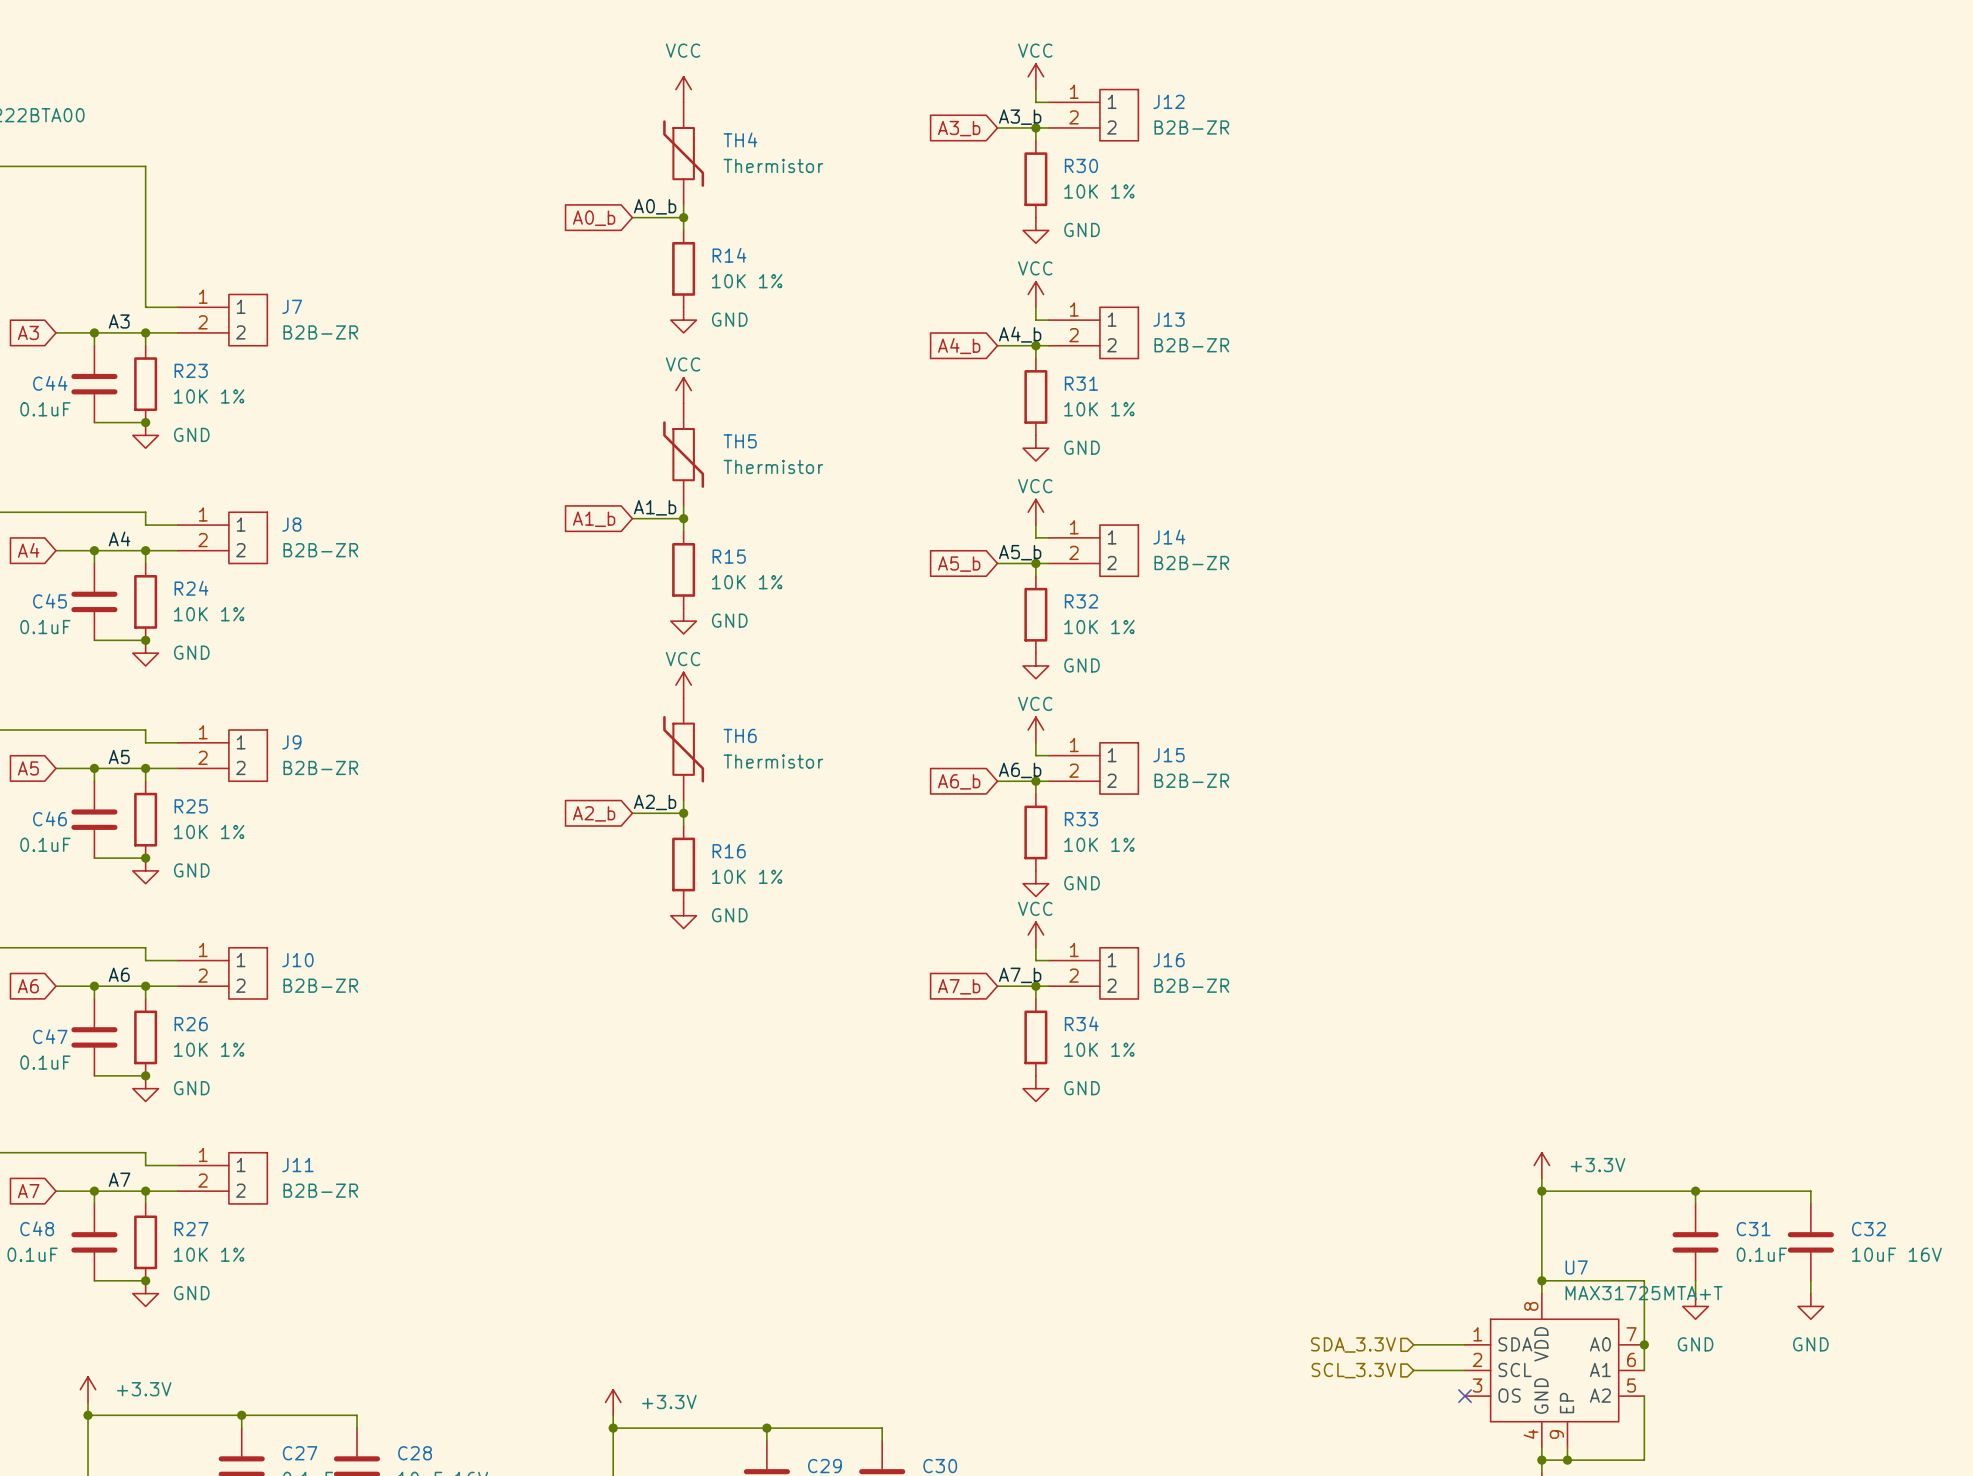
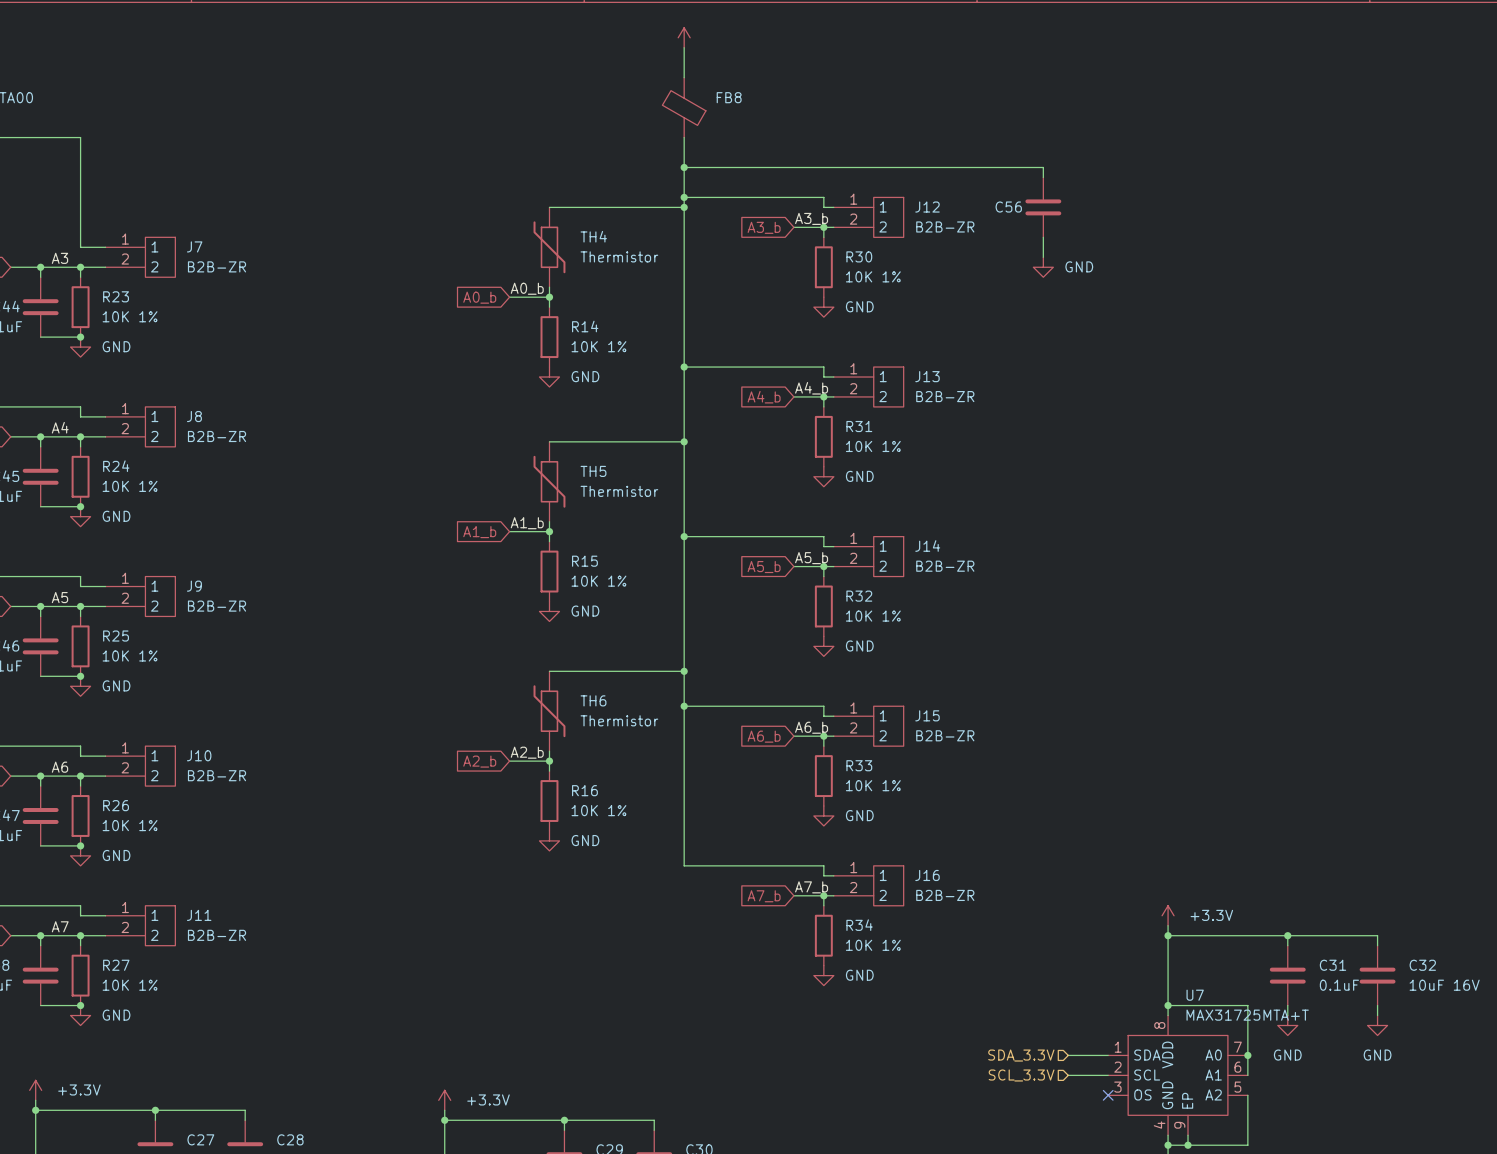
power symbol: none -> (684, 37)
wire: none -> (684, 47) (684, 77)
power symbol: VCC (1035, 76) -> none
power symbol: VCC (683, 89) -> none
wire: (1035, 89) (1035, 102) (1048, 102) -> none
J12 position: (1093, 115) -> (868, 217)
label position: A3_b (1020, 117) -> A3_b (811, 218)
FB8: none -> (684, 107)
wire: (997, 127) (1048, 127) -> (793, 227) (833, 227)
wire: (1035, 127) (1035, 140) -> (823, 227) (823, 237)
junction: (1035, 127) -> none
global label position: A3_b (959, 128) -> A3_b (764, 227)
TH4 position: (683, 153) -> (549, 247)
wire: none -> (684, 137) (684, 865) (823, 865) (823, 875) (833, 875)
R30 position: (1035, 179) -> (823, 267)
wire: (683, 204) (683, 230) -> (549, 287) (549, 307)
wire: none -> (684, 167) (1043, 167) (1043, 177)
junction: none -> (684, 167)
label position: A0_b (655, 206) -> A0_b (527, 288)
wire: (632, 217) (683, 217) -> (509, 297) (549, 297)
junction: (683, 217) -> none
global label position: A0_b (594, 218) -> A0_b (479, 297)
power symbol: GND (1035, 230) -> none
wire: none -> (684, 197) (823, 197) (823, 207) (833, 207)
junction: none -> (684, 197)
wire: none -> (549, 207) (684, 207)
junction: none -> (684, 207)
C56: none -> (1043, 207)
R14 position: (683, 268) -> (549, 337)
junction: none -> (823, 227)
power symbol: VCC (1035, 294) -> none
wire: none -> (1043, 237) (1043, 257)
wire: (1035, 307) (1035, 320) (1048, 320) -> none
power symbol: GND (683, 320) -> none
J13 position: (1093, 332) -> (868, 386)
power symbol: none -> GND (1043, 267)
label position: A4_b (1020, 334) -> A4_b (811, 388)
wire: (997, 345) (1048, 345) -> (793, 396) (833, 396)
wire: (1035, 345) (1035, 358) -> (823, 396) (823, 406)
junction: (1035, 345) -> none
global label position: A4_b (959, 346) -> A4_b (764, 397)
junction: none -> (549, 297)
power symbol: none -> GND (823, 307)
power symbol: VCC (683, 390) -> none
R31 position: (1035, 396) -> (823, 436)
power symbol: GND (1035, 448) -> none
TH5 position: (683, 454) -> (549, 481)
wire: none -> (684, 367) (823, 367) (823, 377) (833, 377)
junction: none -> (684, 367)
power symbol: none -> GND (549, 377)
junction: none -> (823, 396)
wire: (683, 505) (683, 531) -> (549, 521) (549, 541)
label position: A1_b (655, 507) -> A1_b (527, 523)
power symbol: VCC (1035, 512) -> none
wire: (632, 518) (683, 518) -> (509, 531) (549, 531)
junction: (683, 518) -> none
global label position: A1_b (594, 519) -> A1_b (479, 532)
wire: (1035, 525) (1035, 537) (1048, 537) -> none
J14 position: (1093, 550) -> (868, 556)
label position: A5_b (1020, 552) -> A5_b (811, 558)
wire: none -> (549, 441) (684, 441)
junction: none -> (684, 441)
wire: (997, 563) (1048, 563) -> (793, 566) (833, 566)
wire: (1035, 563) (1035, 576) -> (823, 566) (823, 576)
junction: (1035, 563) -> none
global label position: A5_b (959, 564) -> A5_b (764, 567)
R15 position: (683, 569) -> (549, 571)
power symbol: none -> GND (823, 476)
R32 position: (1035, 614) -> (823, 606)
power symbol: GND (683, 621) -> none
power symbol: GND (1035, 665) -> none
junction: none -> (549, 531)
wire: none -> (684, 536) (823, 536) (823, 546) (833, 546)
junction: none -> (684, 536)
power symbol: VCC (683, 685) -> none
junction: none -> (823, 566)
power symbol: VCC (1035, 730) -> none
wire: (1035, 742) (1035, 755) (1048, 755) -> none
TH6 position: (683, 749) -> (549, 711)
J15 position: (1093, 768) -> (868, 726)
label position: A6_b (1020, 770) -> A6_b (811, 727)
power symbol: none -> GND (549, 611)
global label position: A6_b (959, 781) -> A6_b (764, 736)
wire: (997, 781) (1048, 781) -> (793, 736) (833, 736)
wire: (1035, 781) (1035, 794) -> (823, 736) (823, 746)
junction: (1035, 781) -> none
wire: (683, 800) (683, 826) -> (549, 751) (549, 771)
label position: A2_b (655, 802) -> A2_b (527, 752)
global label position: A2_b (594, 813) -> A2_b (479, 761)
wire: (632, 813) (683, 813) -> (509, 761) (549, 761)
junction: (683, 813) -> none
power symbol: none -> GND (823, 646)
R33 position: (1035, 832) -> (823, 776)
wire: none -> (549, 671) (684, 671)
junction: none -> (684, 671)
R16 position: (683, 864) -> (549, 801)
power symbol: GND (1035, 883) -> none
wire: none -> (684, 706) (823, 706) (823, 716) (833, 716)
junction: none -> (684, 706)
power symbol: GND (683, 915) -> none
power symbol: VCC (1035, 934) -> none
junction: none -> (823, 736)
wire: (1035, 947) (1035, 960) (1048, 960) -> none
junction: none -> (549, 761)
J16 position: (1093, 973) -> (868, 885)
label position: A7_b (1020, 975) -> A7_b (811, 887)
global label position: A7_b (959, 986) -> A7_b (764, 896)
wire: (997, 986) (1048, 986) -> (793, 895) (833, 895)
wire: (1035, 986) (1035, 999) -> (823, 895) (823, 905)
junction: (1035, 986) -> none
R34 position: (1035, 1037) -> (823, 935)
power symbol: none -> GND (549, 840)
power symbol position: GND (1035, 1088) -> GND (823, 815)
junction: none -> (823, 895)
power symbol: none -> GND (823, 975)

